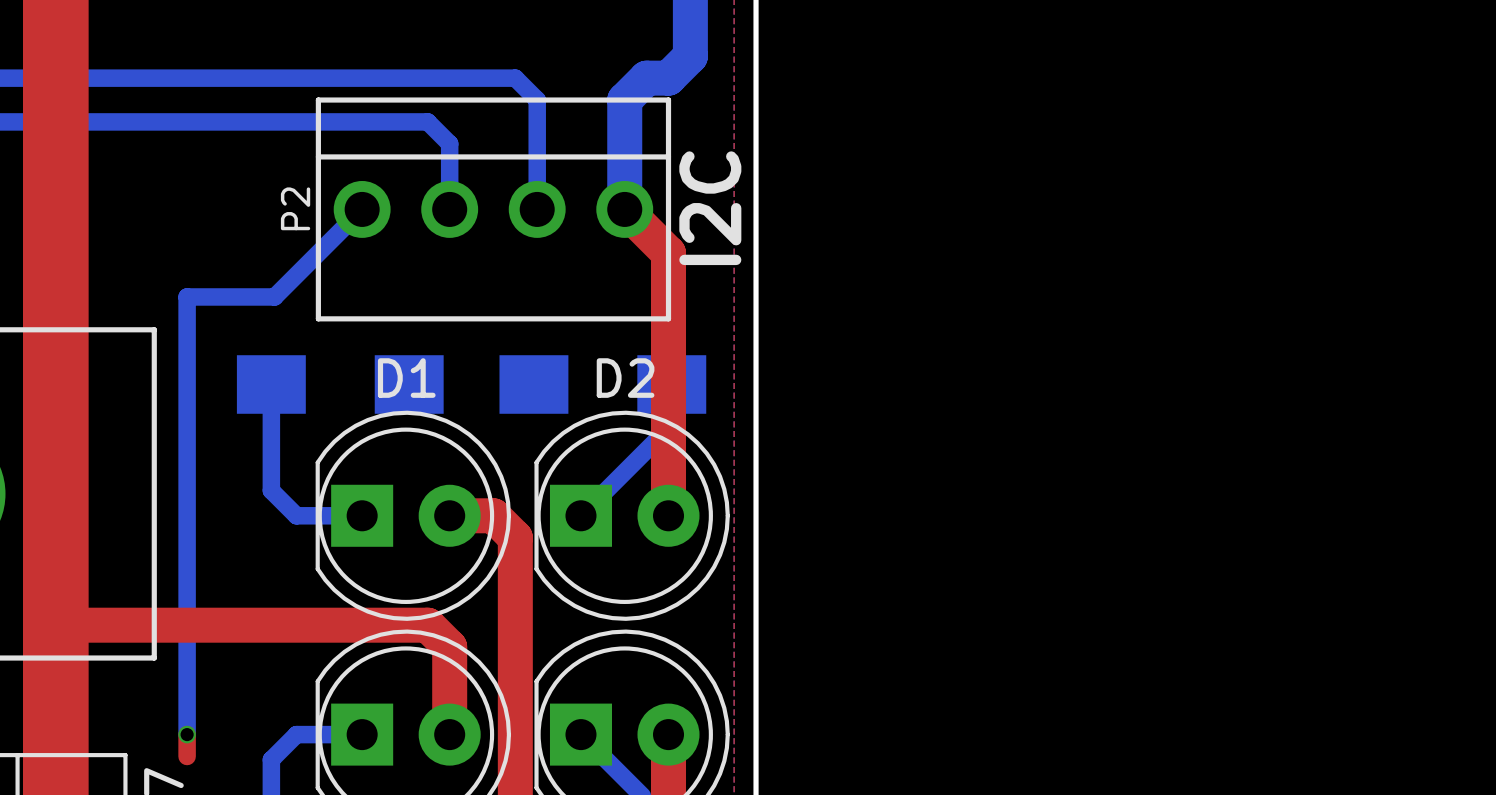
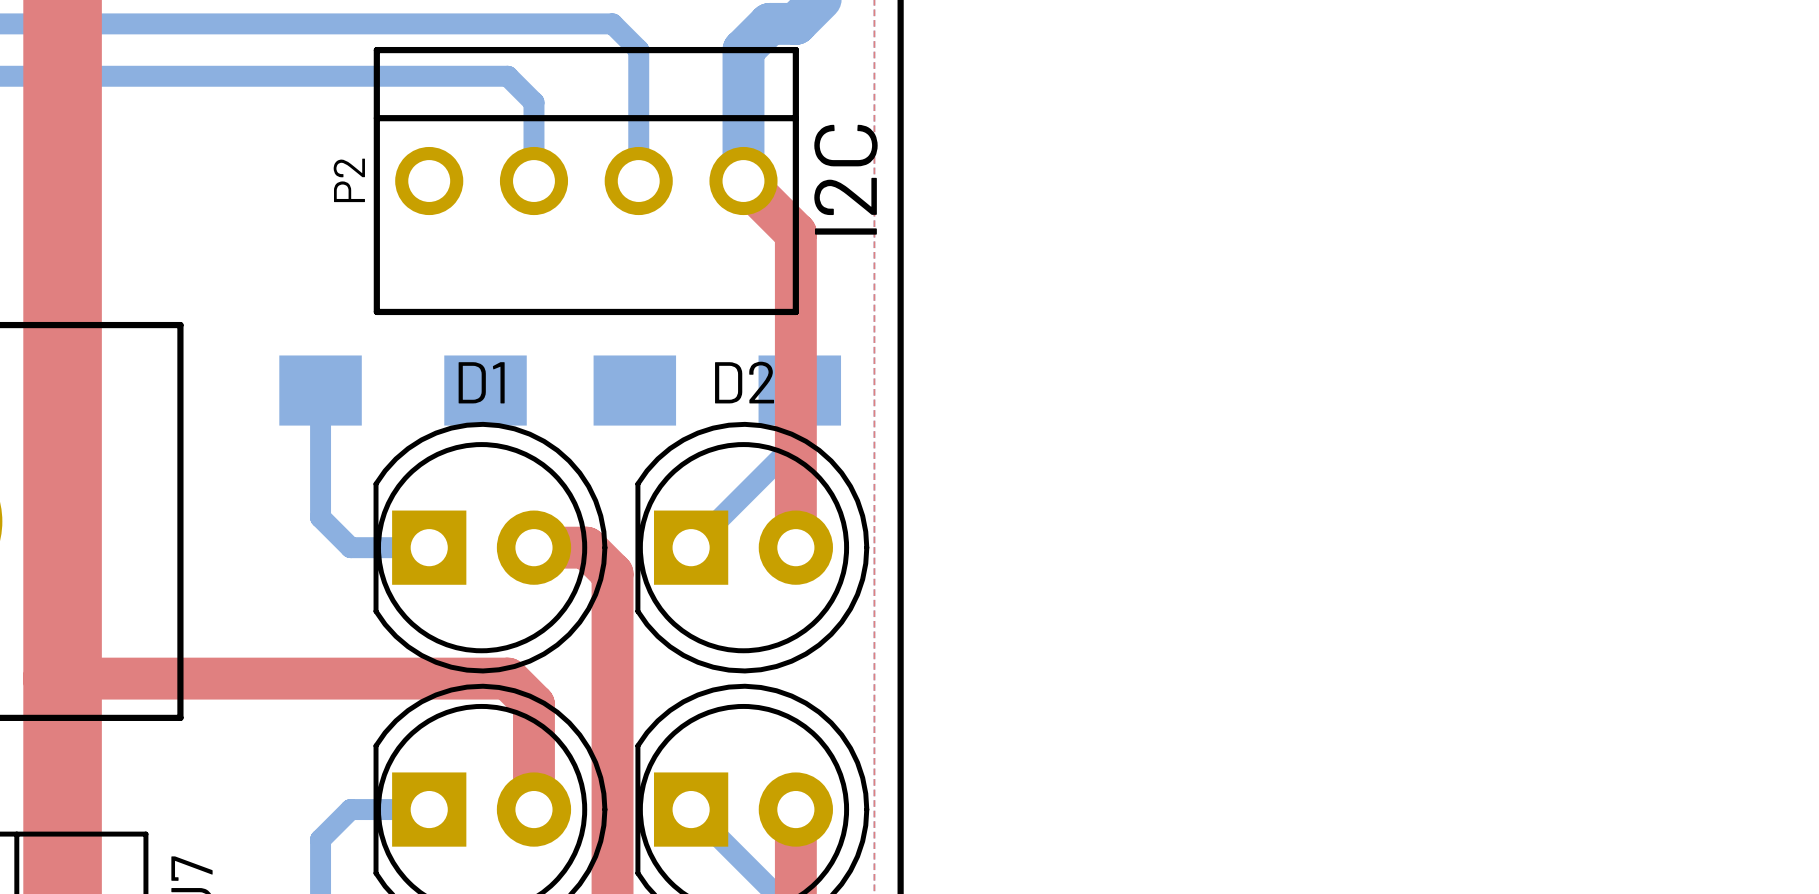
bottom track: (362, 209) (274, 296) (187, 296) (187, 734) -> none
top track: (187, 734) (187, 756) -> none
via: (187, 734) -> none

